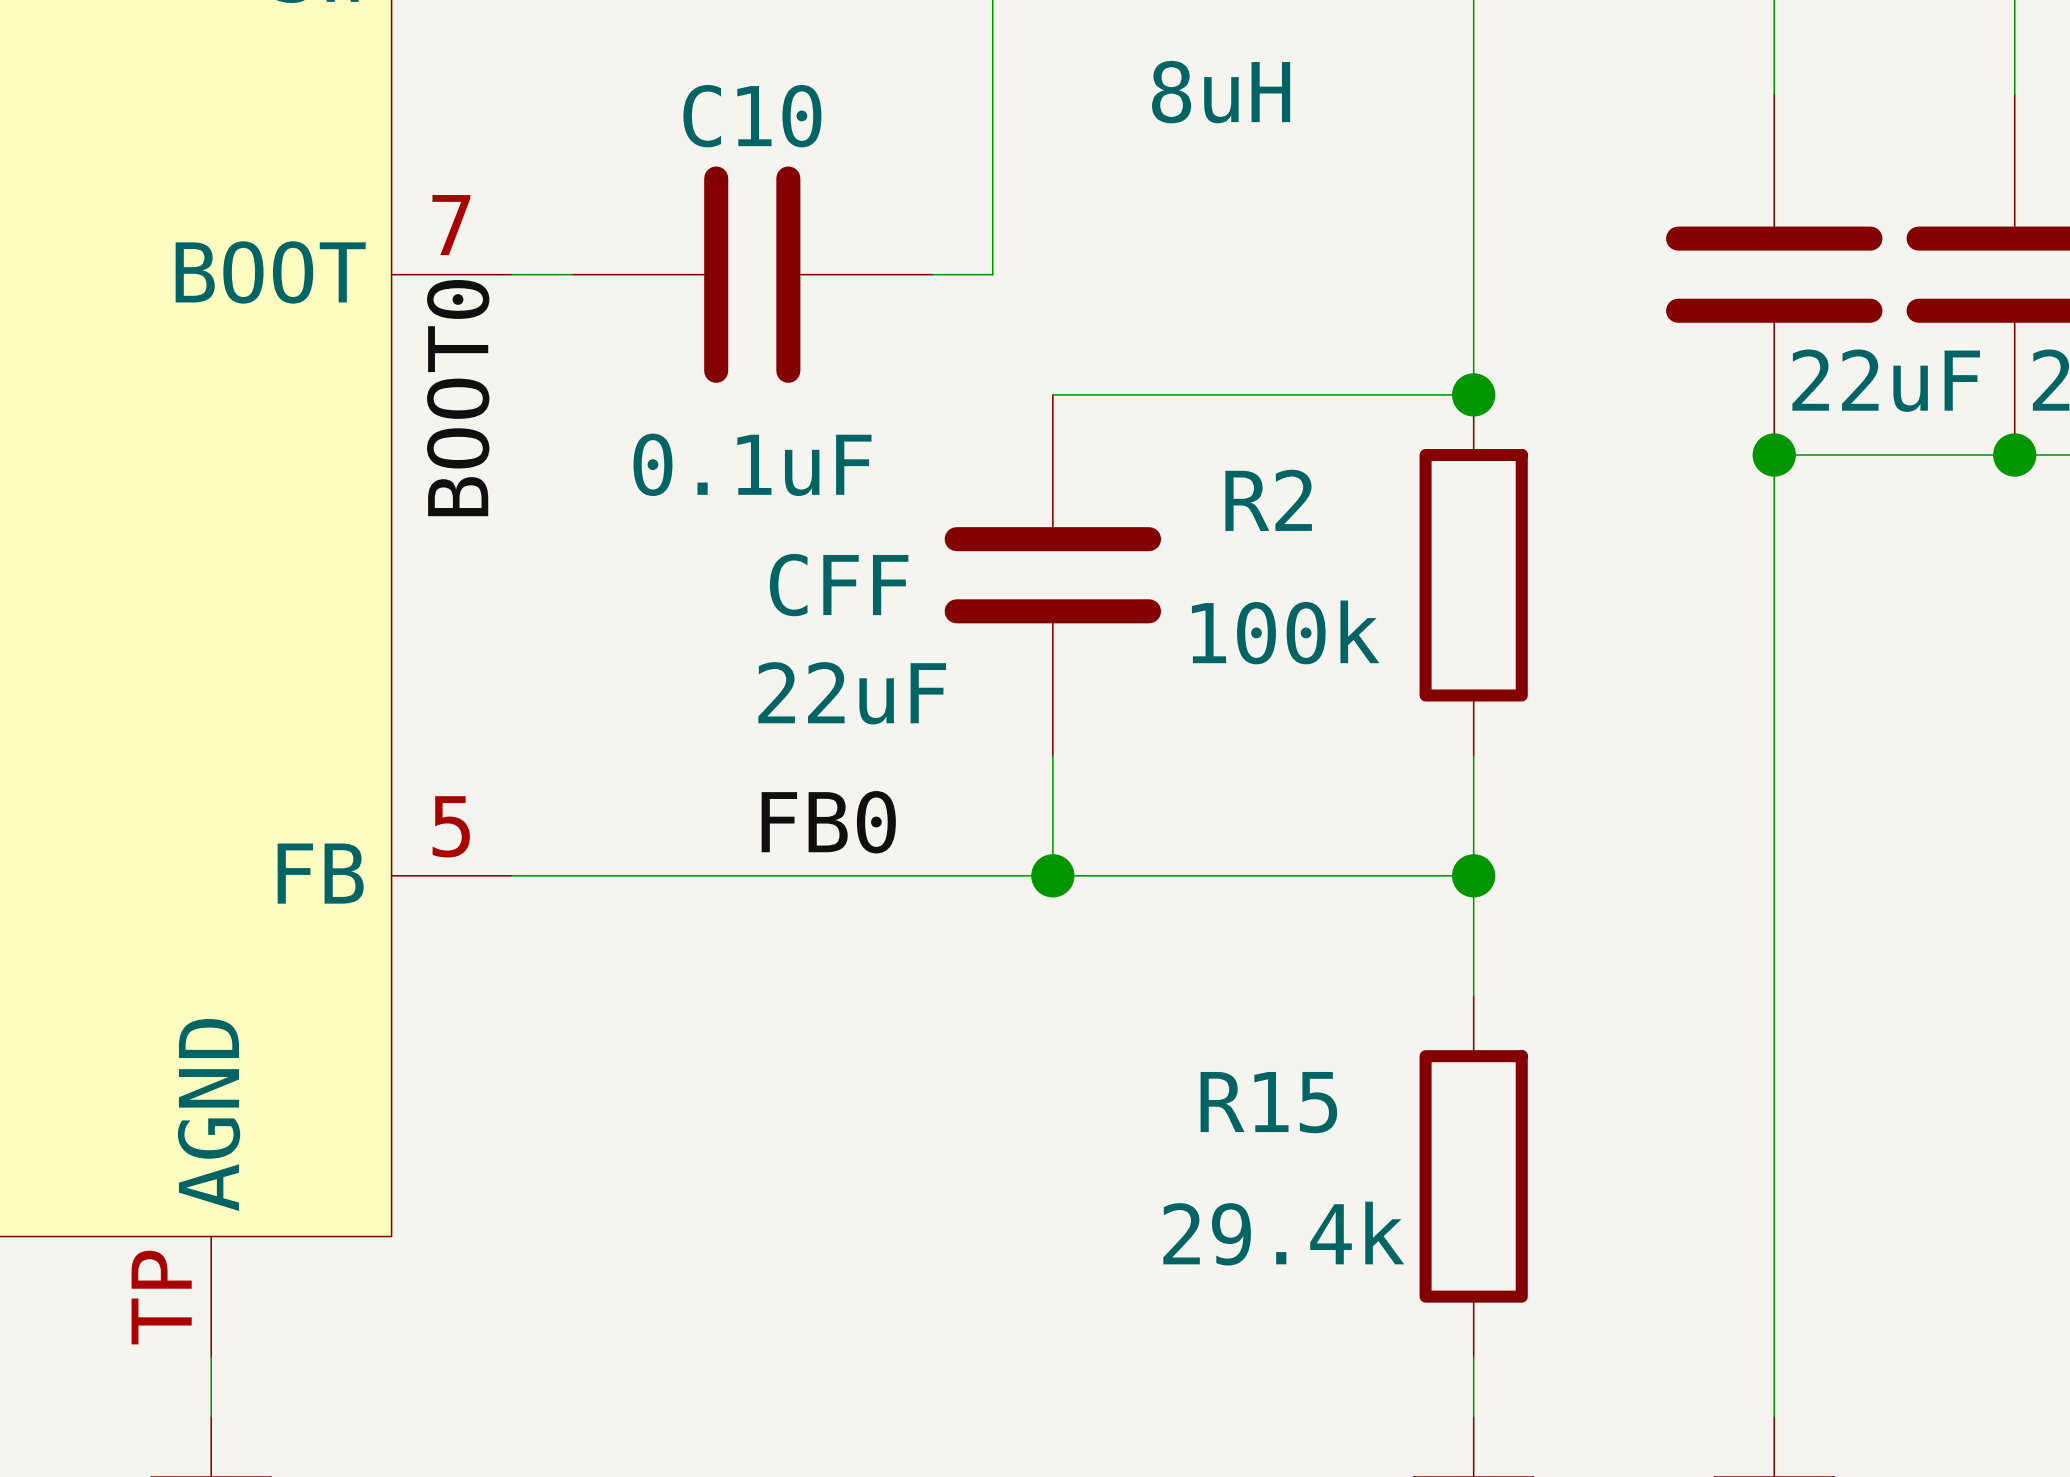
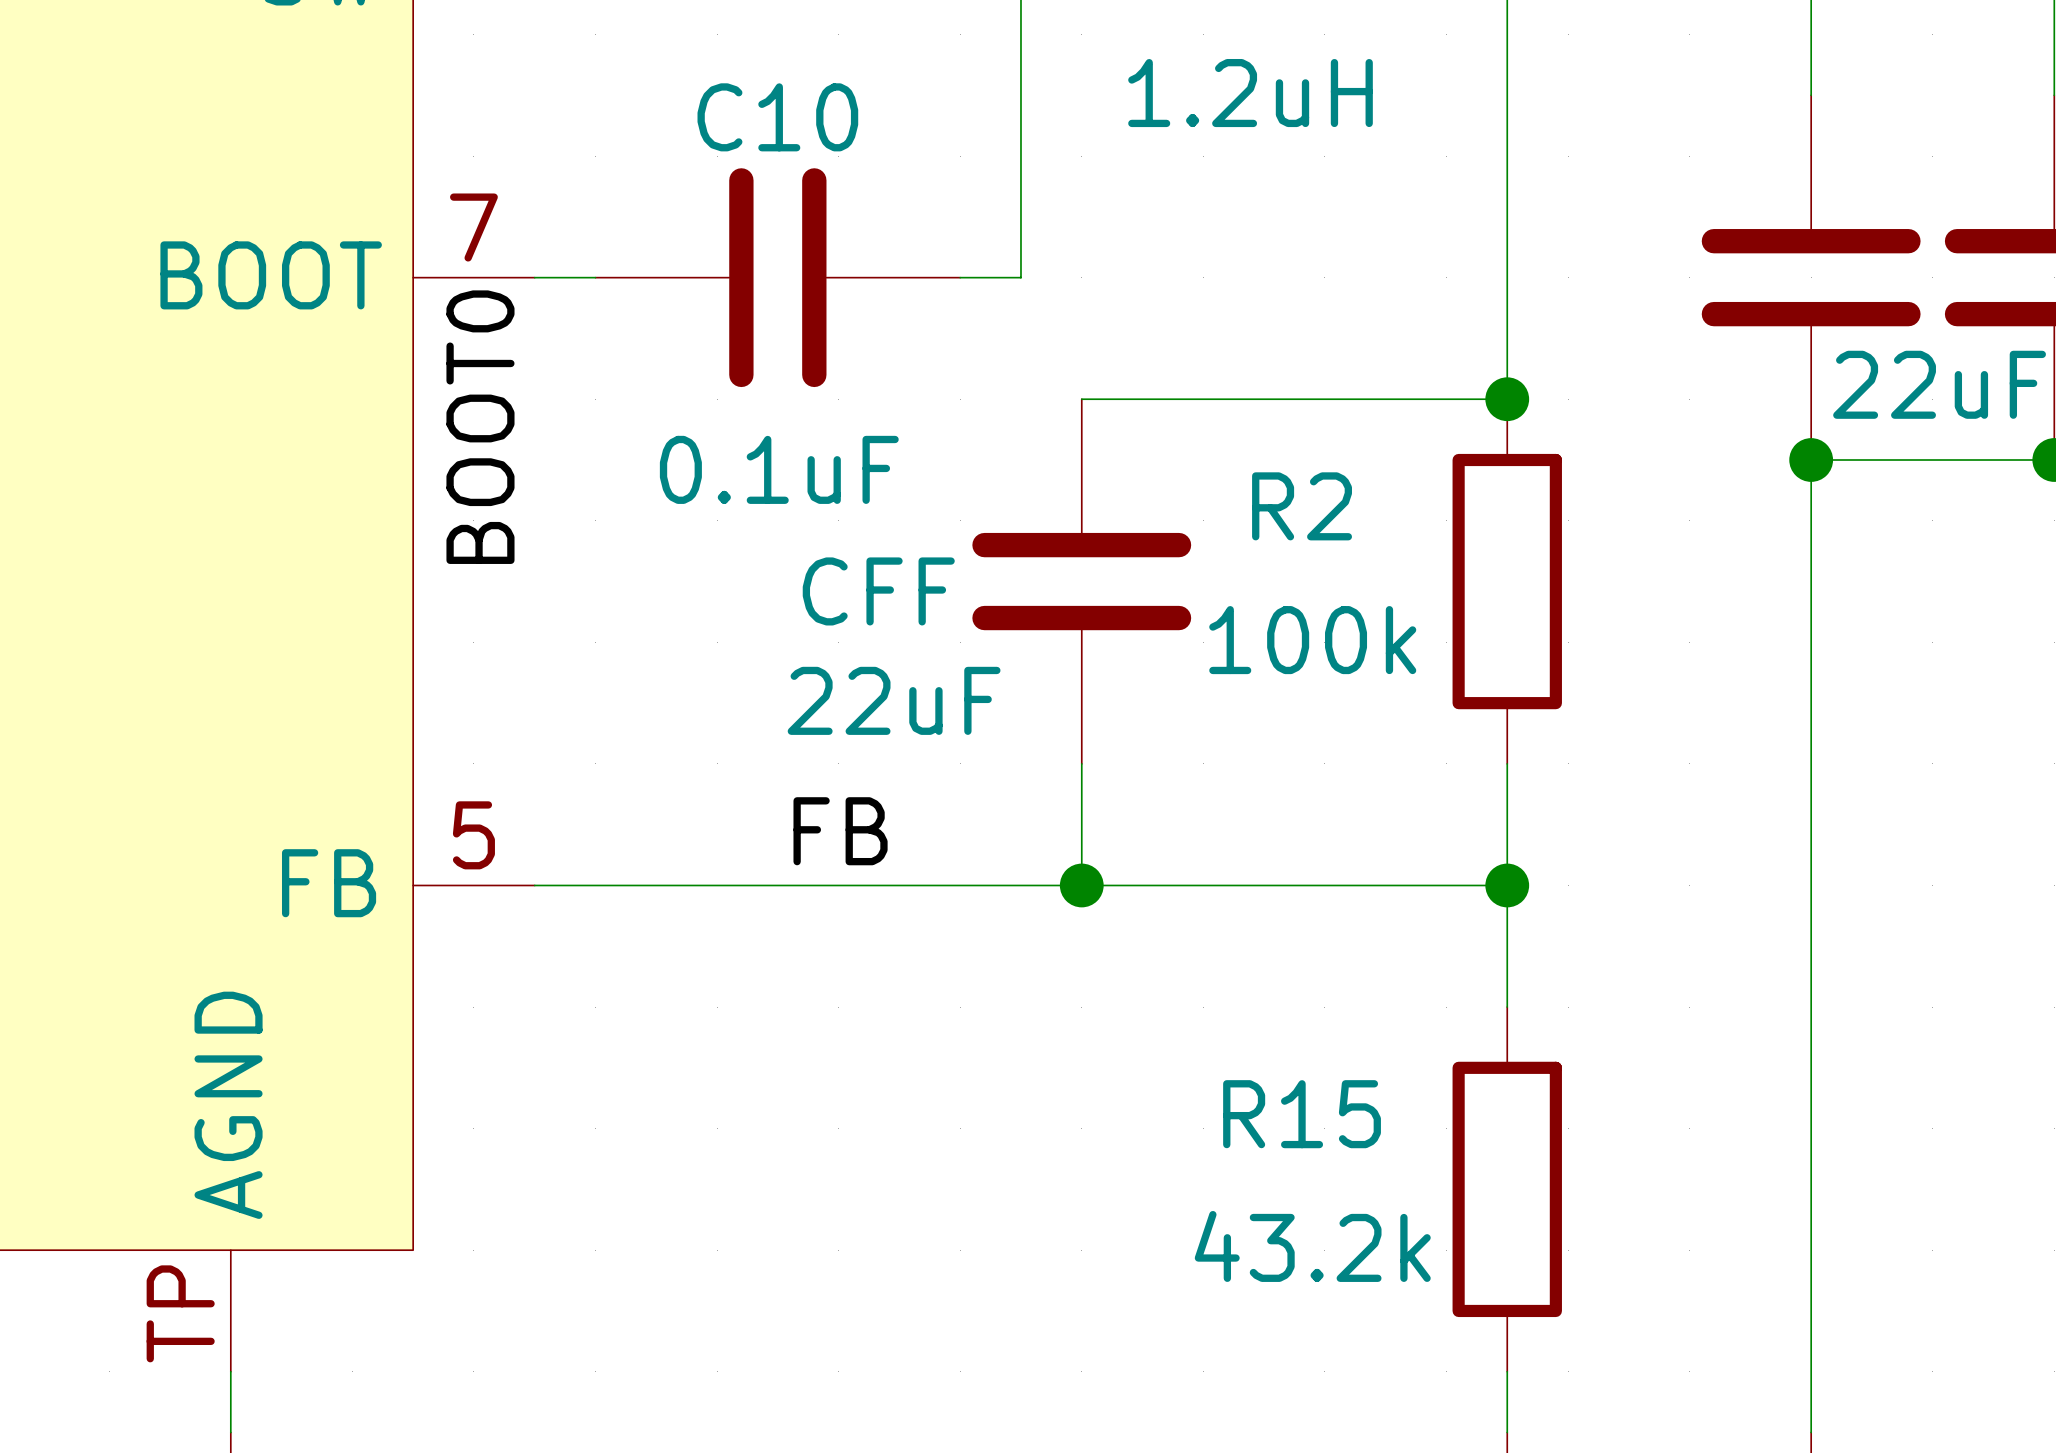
part value: 8uH (1221, 92) -> 1.2uH (1250, 93)
label: FB0 (828, 822) -> FB (840, 831)
R15 value: 29.4k (1283, 1233) -> 43.2k (1312, 1246)

